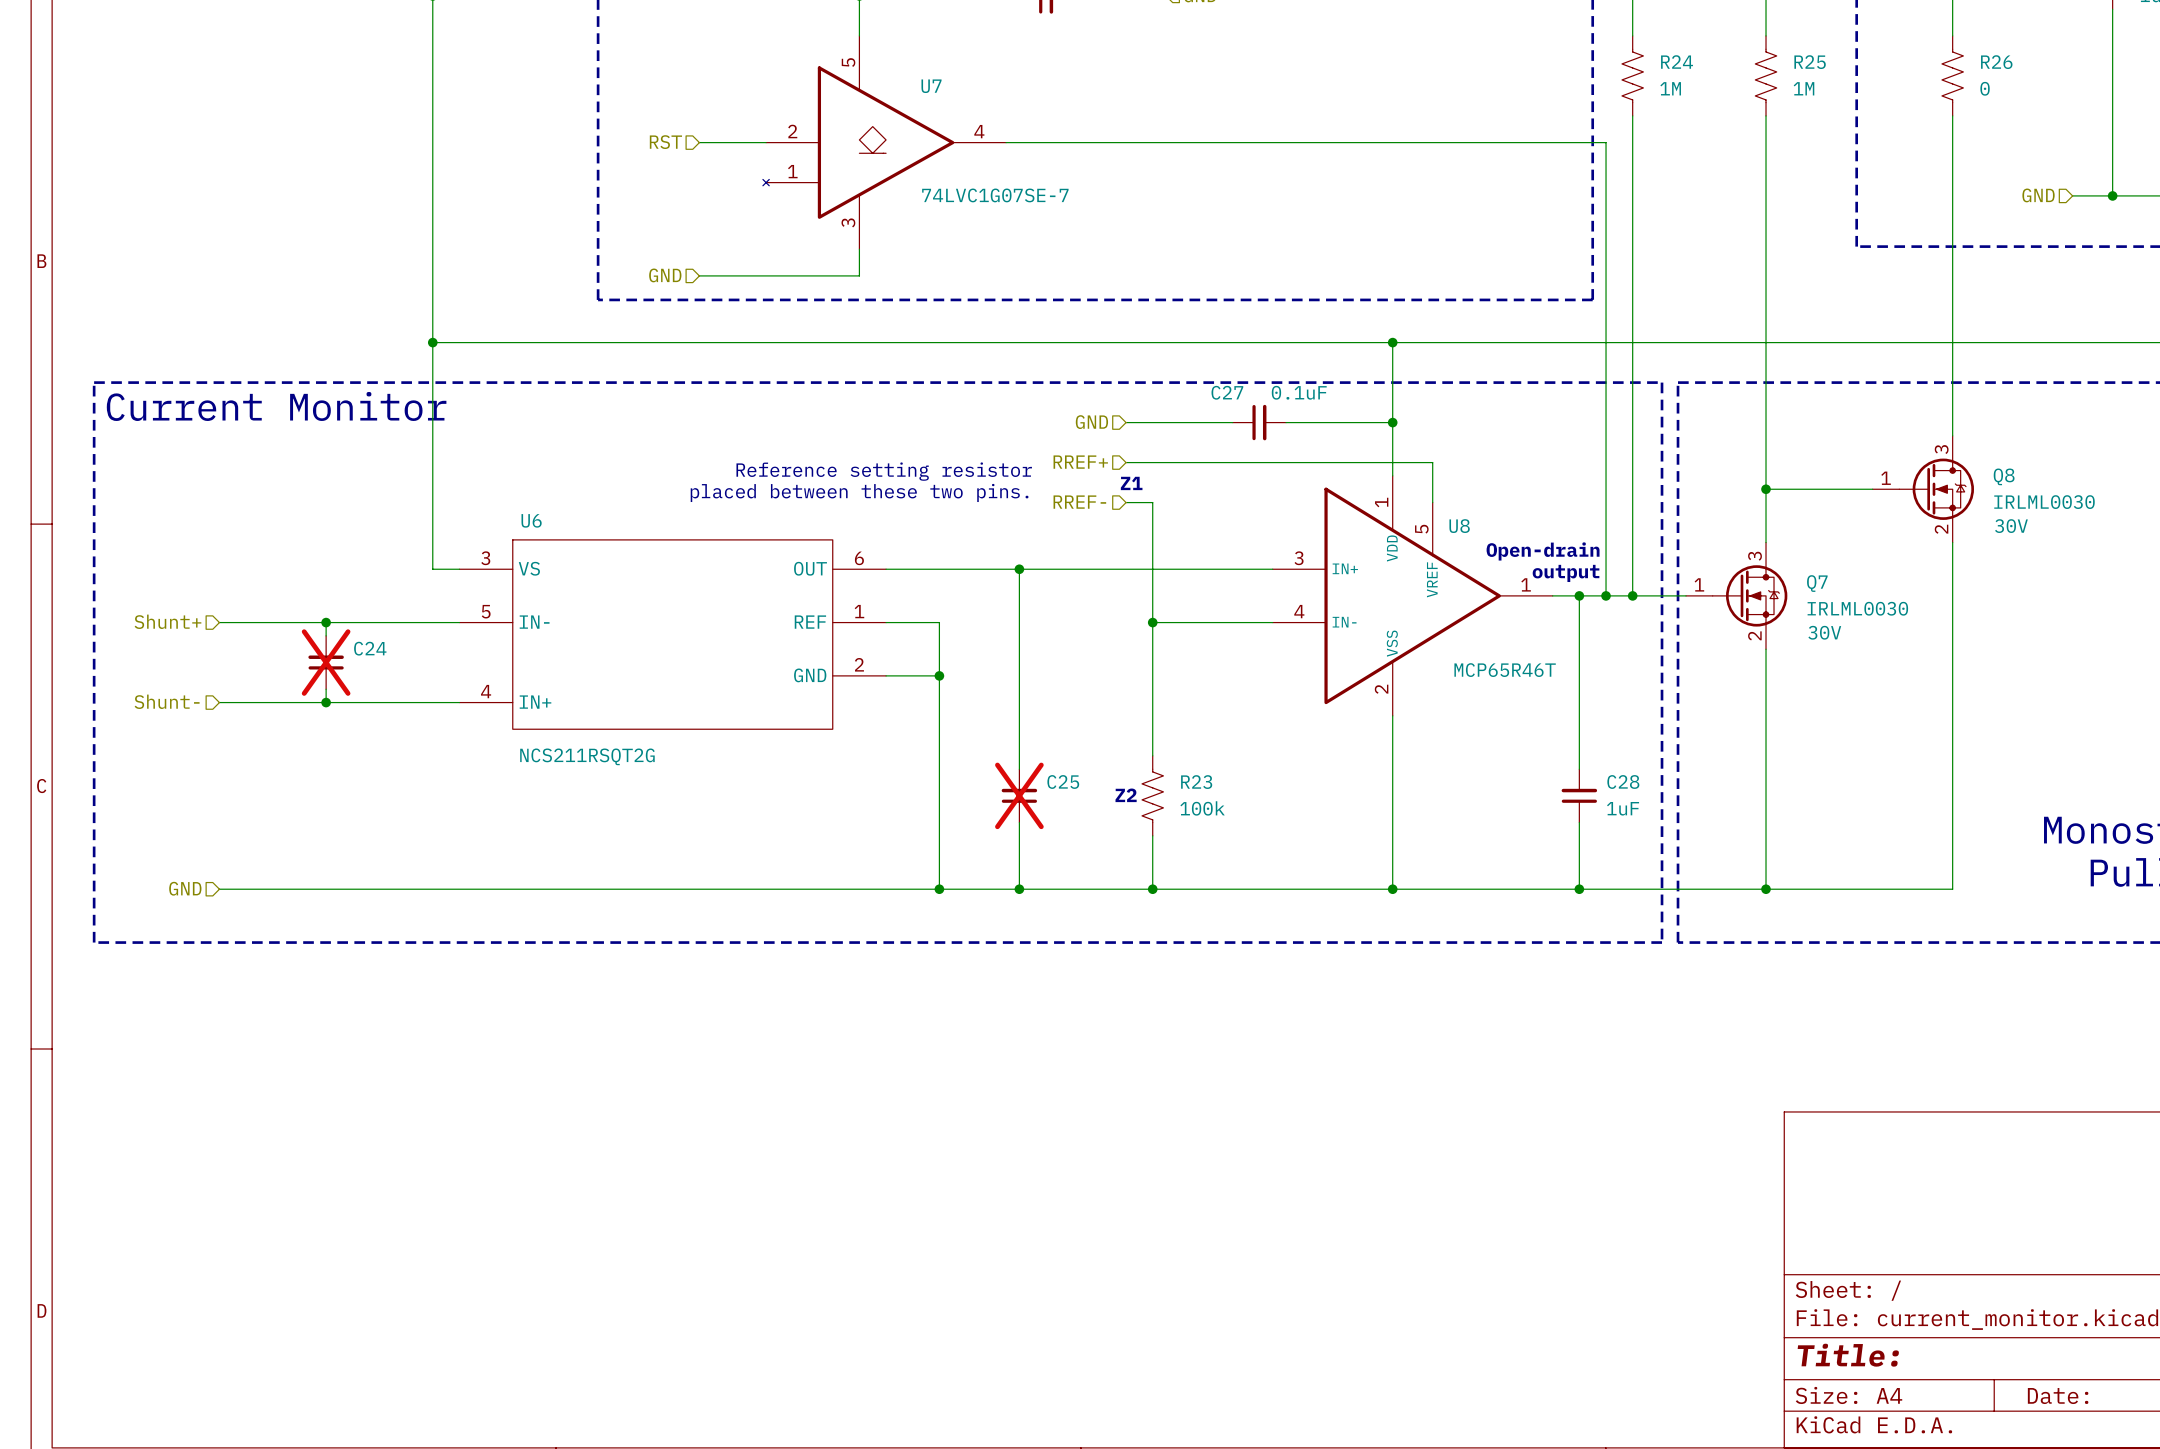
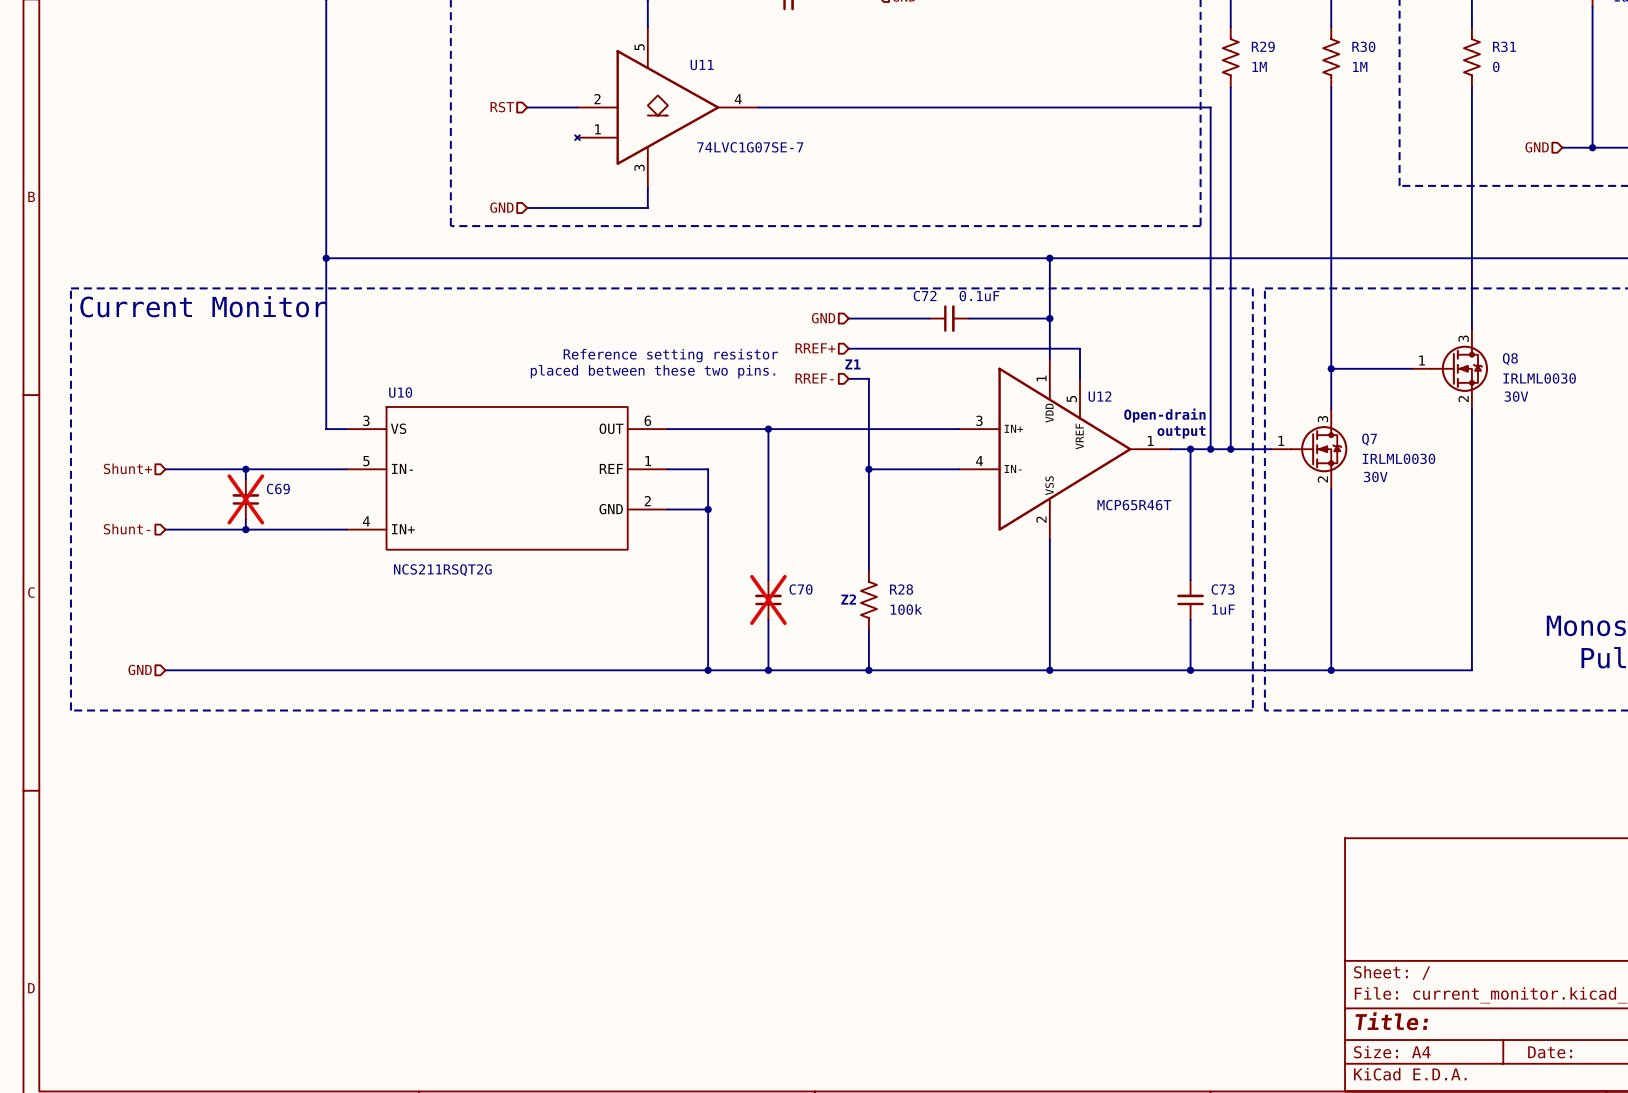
R24 name: R24 (1677, 62) -> R29 (1263, 46)
R25 name: R25 (1810, 62) -> R30 (1363, 46)
R26 name: R26 (1996, 62) -> R31 (1504, 46)
U7 name: U7 (931, 86) -> U11 (702, 65)
C27 name: C27 (1227, 392) -> C72 (925, 296)
U6 name: U6 (531, 520) -> U10 (400, 392)
U8 name: U8 (1459, 526) -> U12 (1100, 396)
C24 name: C24 (370, 648) -> C69 (278, 488)
C25 name: C25 (1063, 781) -> C70 (801, 589)
C28 name: C28 (1623, 781) -> C73 (1223, 589)
R23 name: R23 (1196, 782) -> R28 (901, 589)

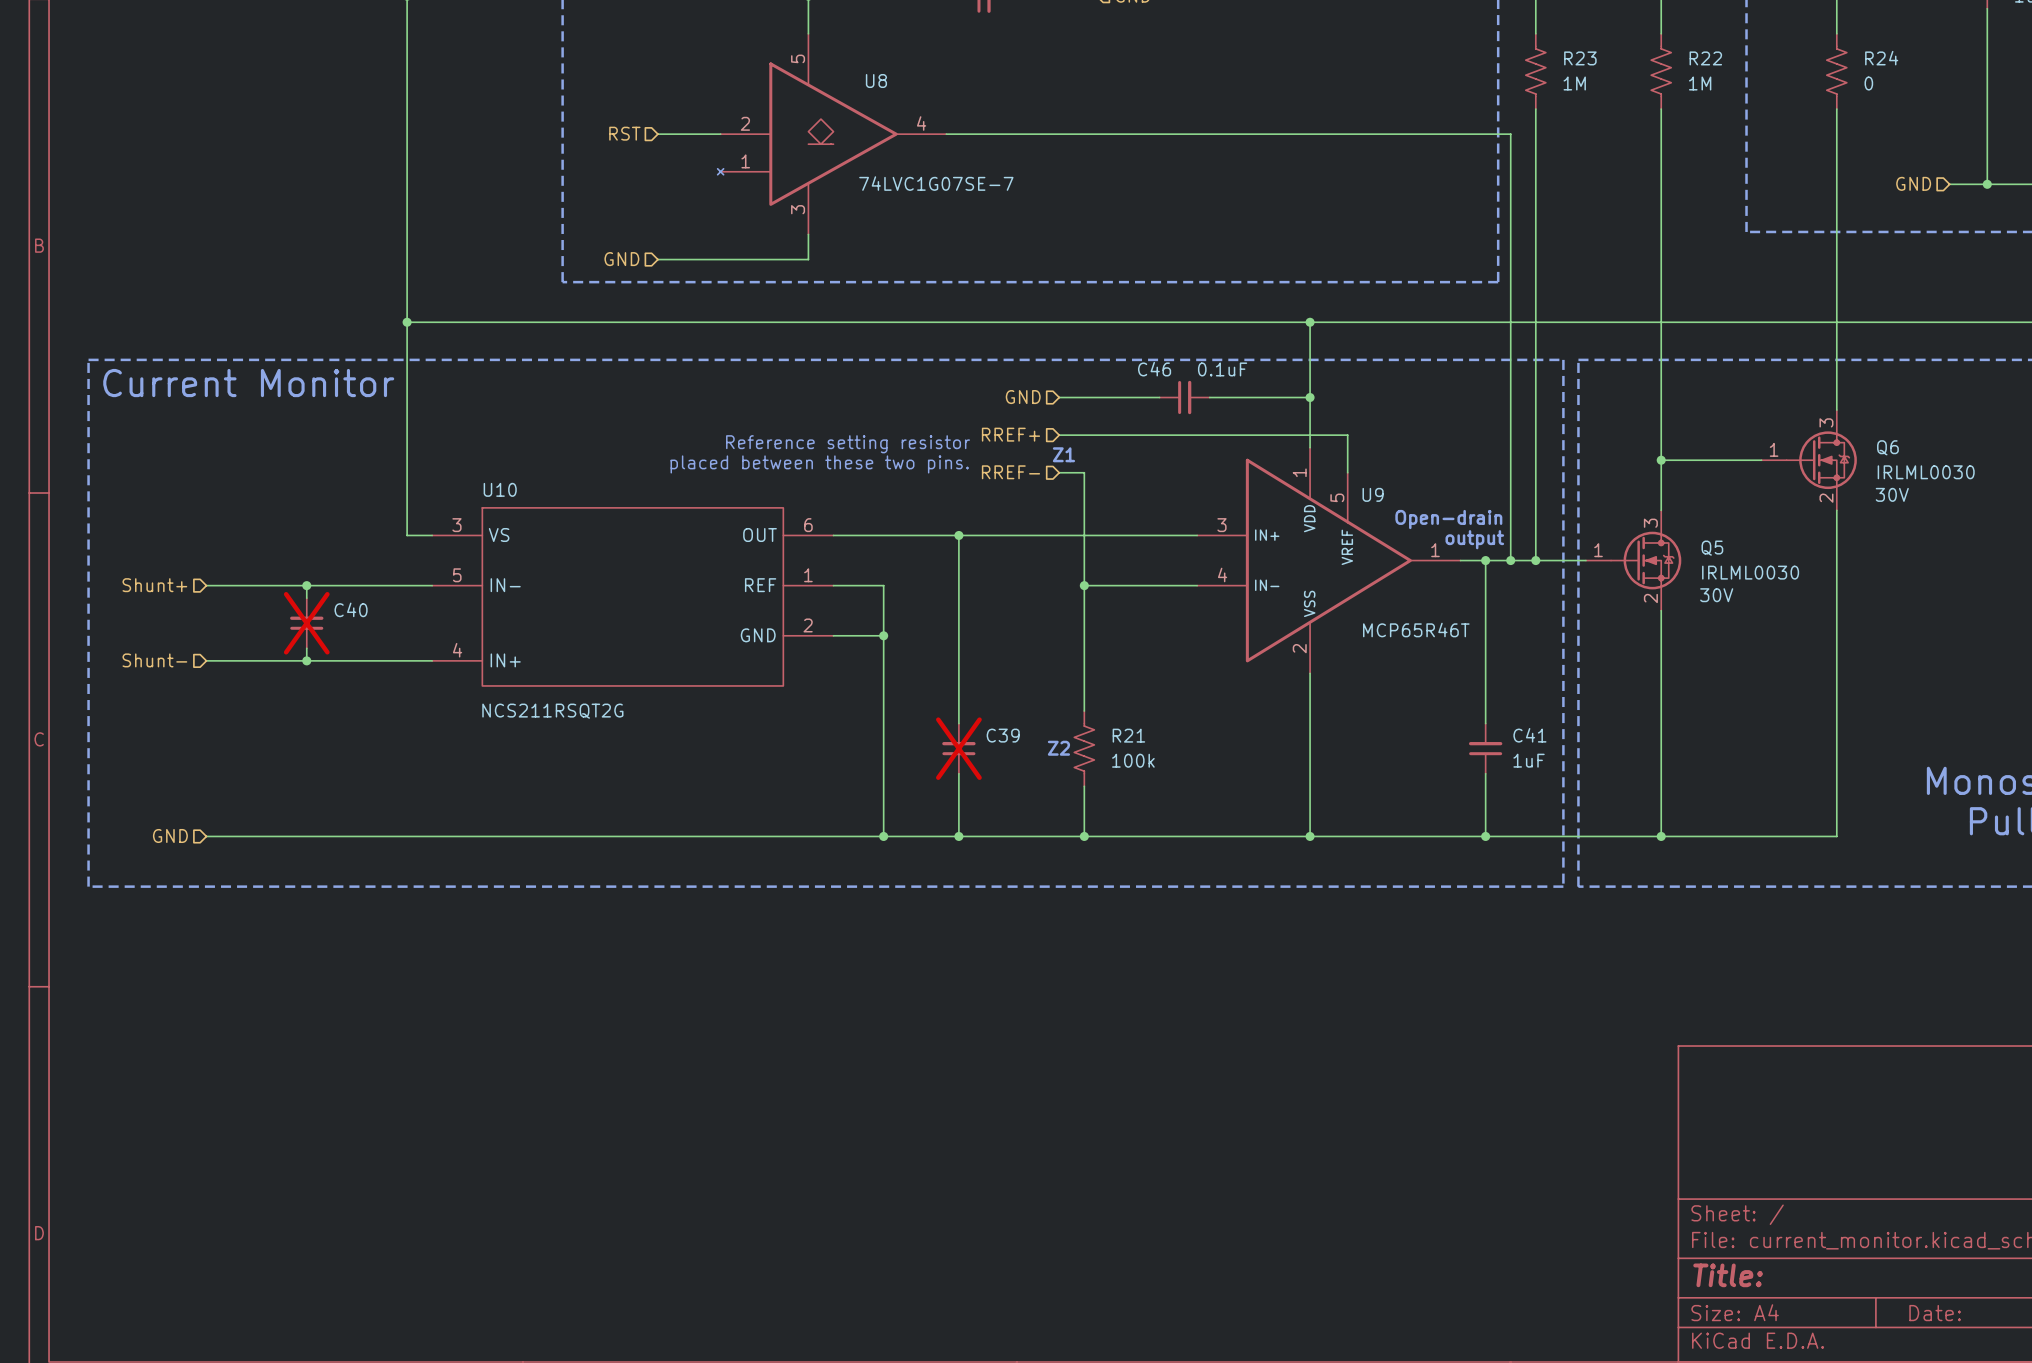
R29 name: R29 (1263, 46) -> R23 (1580, 58)
R30 name: R30 (1363, 46) -> R22 (1705, 58)
R31 name: R31 (1504, 46) -> R24 (1881, 58)
U11 name: U11 (702, 65) -> U8 (876, 81)
C72 name: C72 (925, 296) -> C46 (1154, 369)
Q8 name: Q8 (1510, 359) -> Q6 (1887, 447)
U12 name: U12 (1100, 396) -> U9 (1373, 494)
Q7 name: Q7 (1369, 439) -> Q5 (1712, 548)
C69 name: C69 (278, 488) -> C40 (351, 609)
C70 name: C70 (801, 589) -> C39 (1003, 735)
R28 name: R28 (901, 589) -> R21 (1128, 735)
C73 name: C73 (1223, 589) -> C41 (1529, 735)

